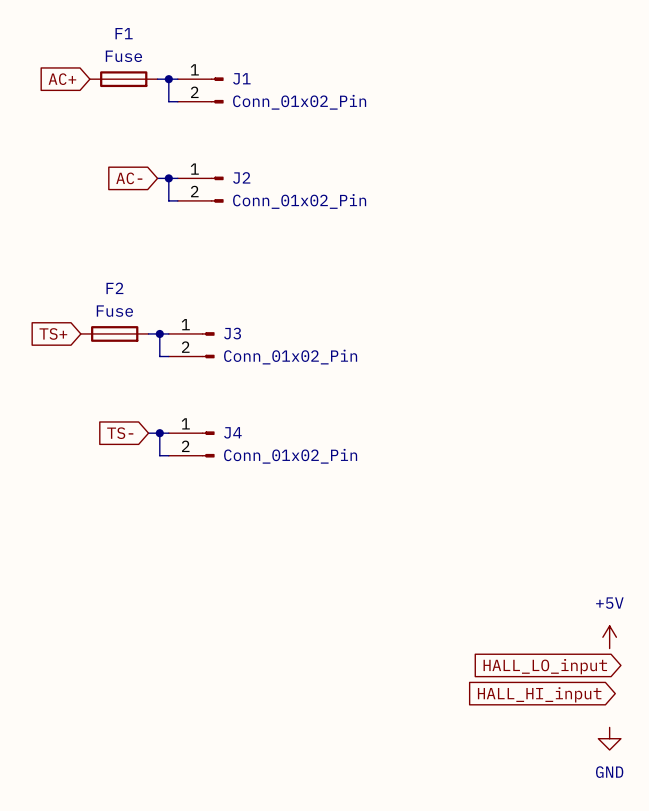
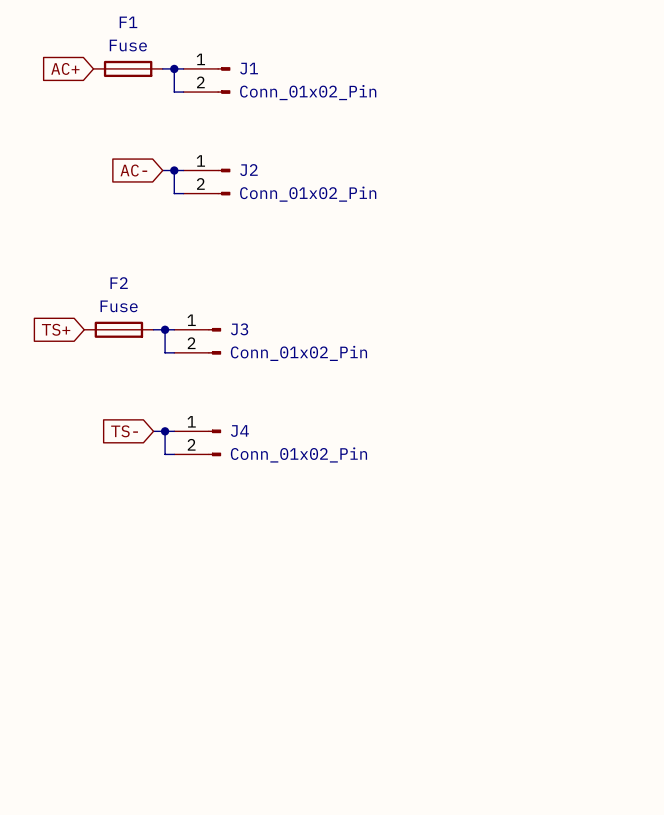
power symbol: +5V (609, 637) -> none
global label: HALL_LO_input (545, 666) -> none
global label: HALL_HI_input (539, 694) -> none
power symbol: GND (609, 738) -> none

